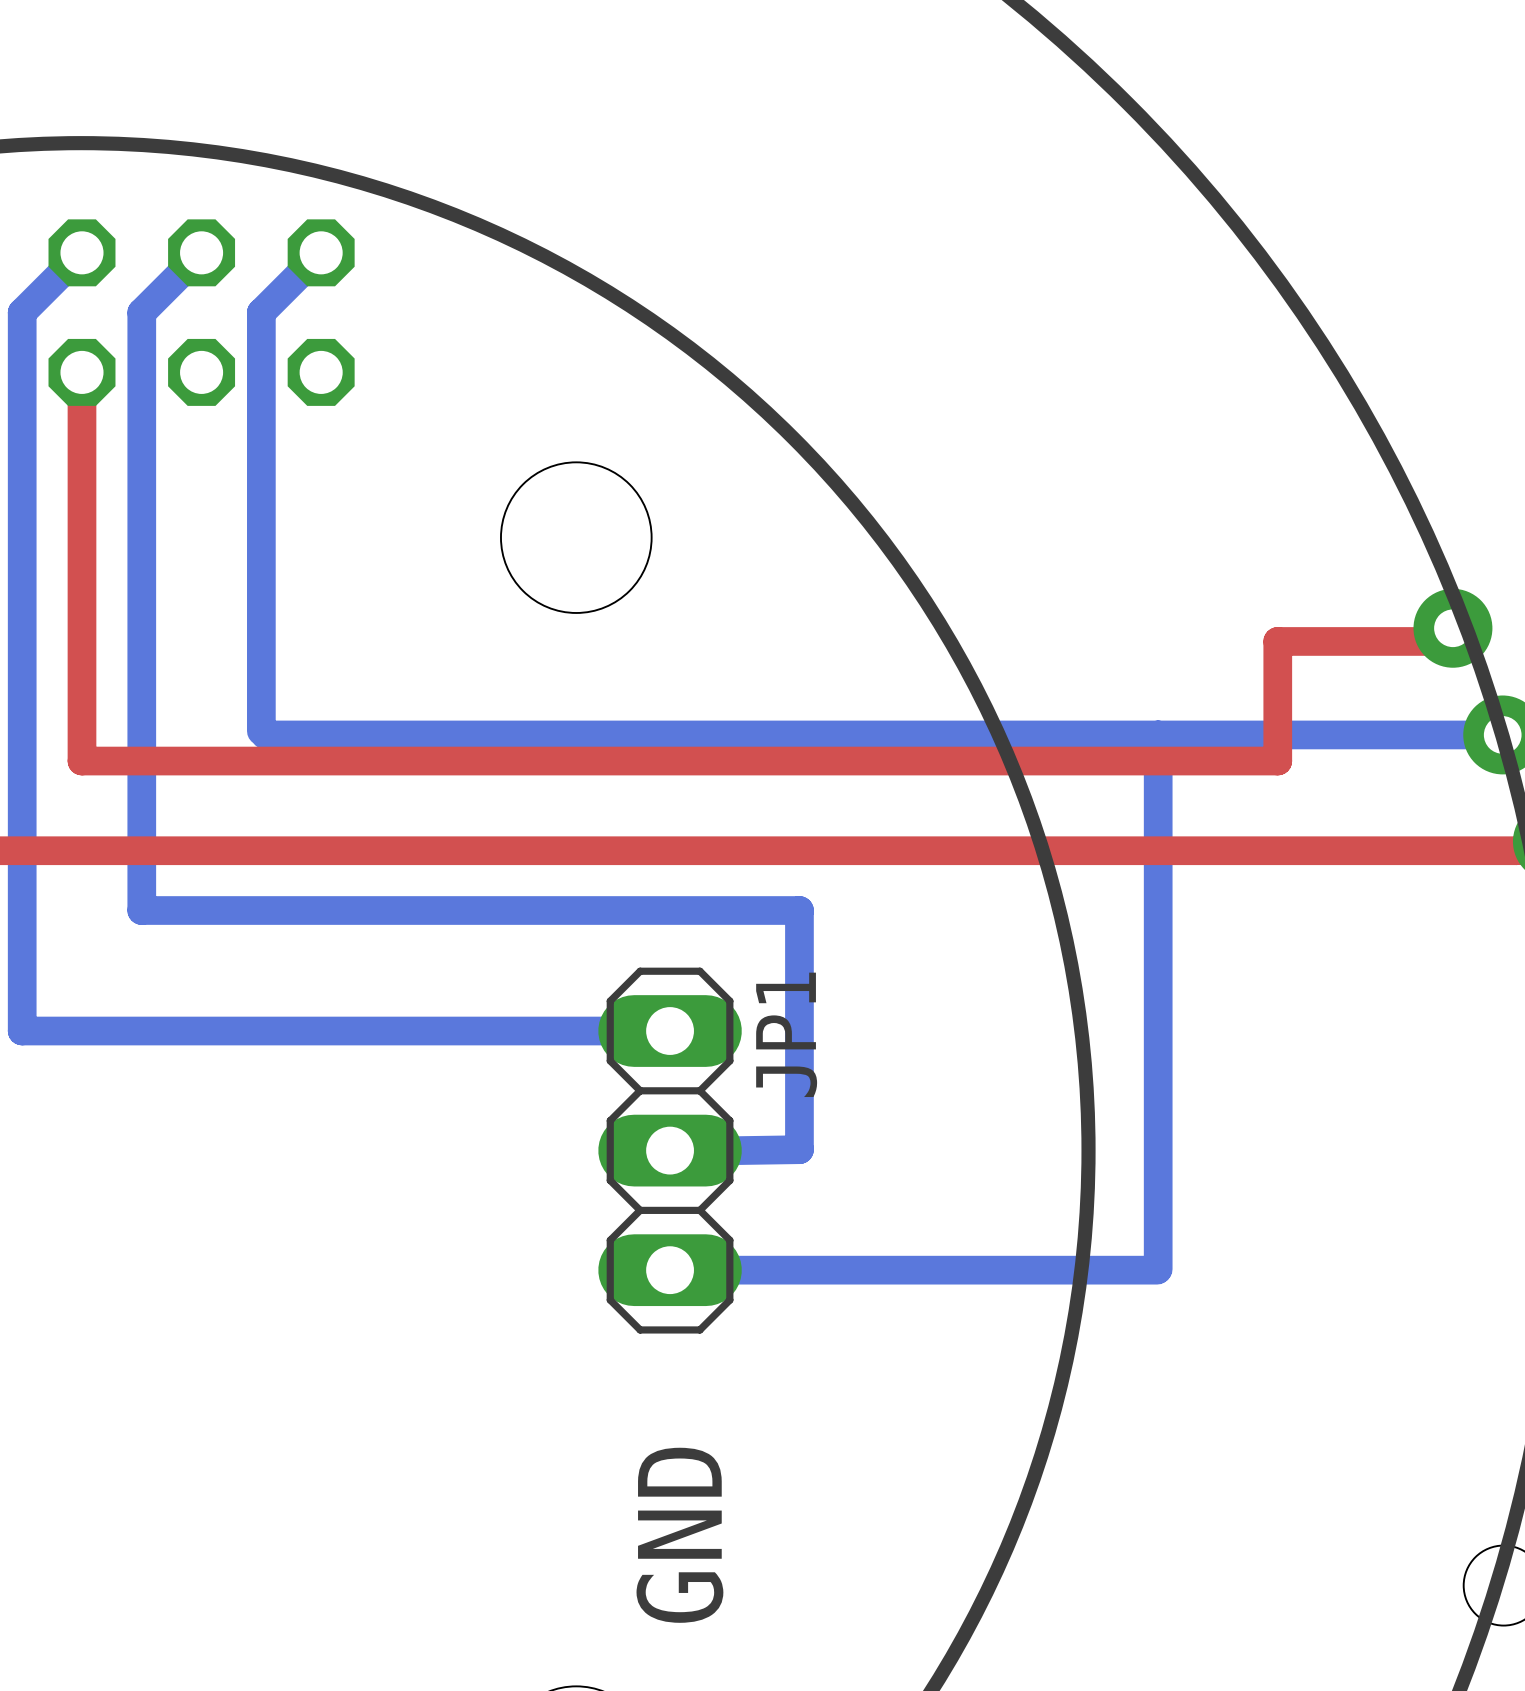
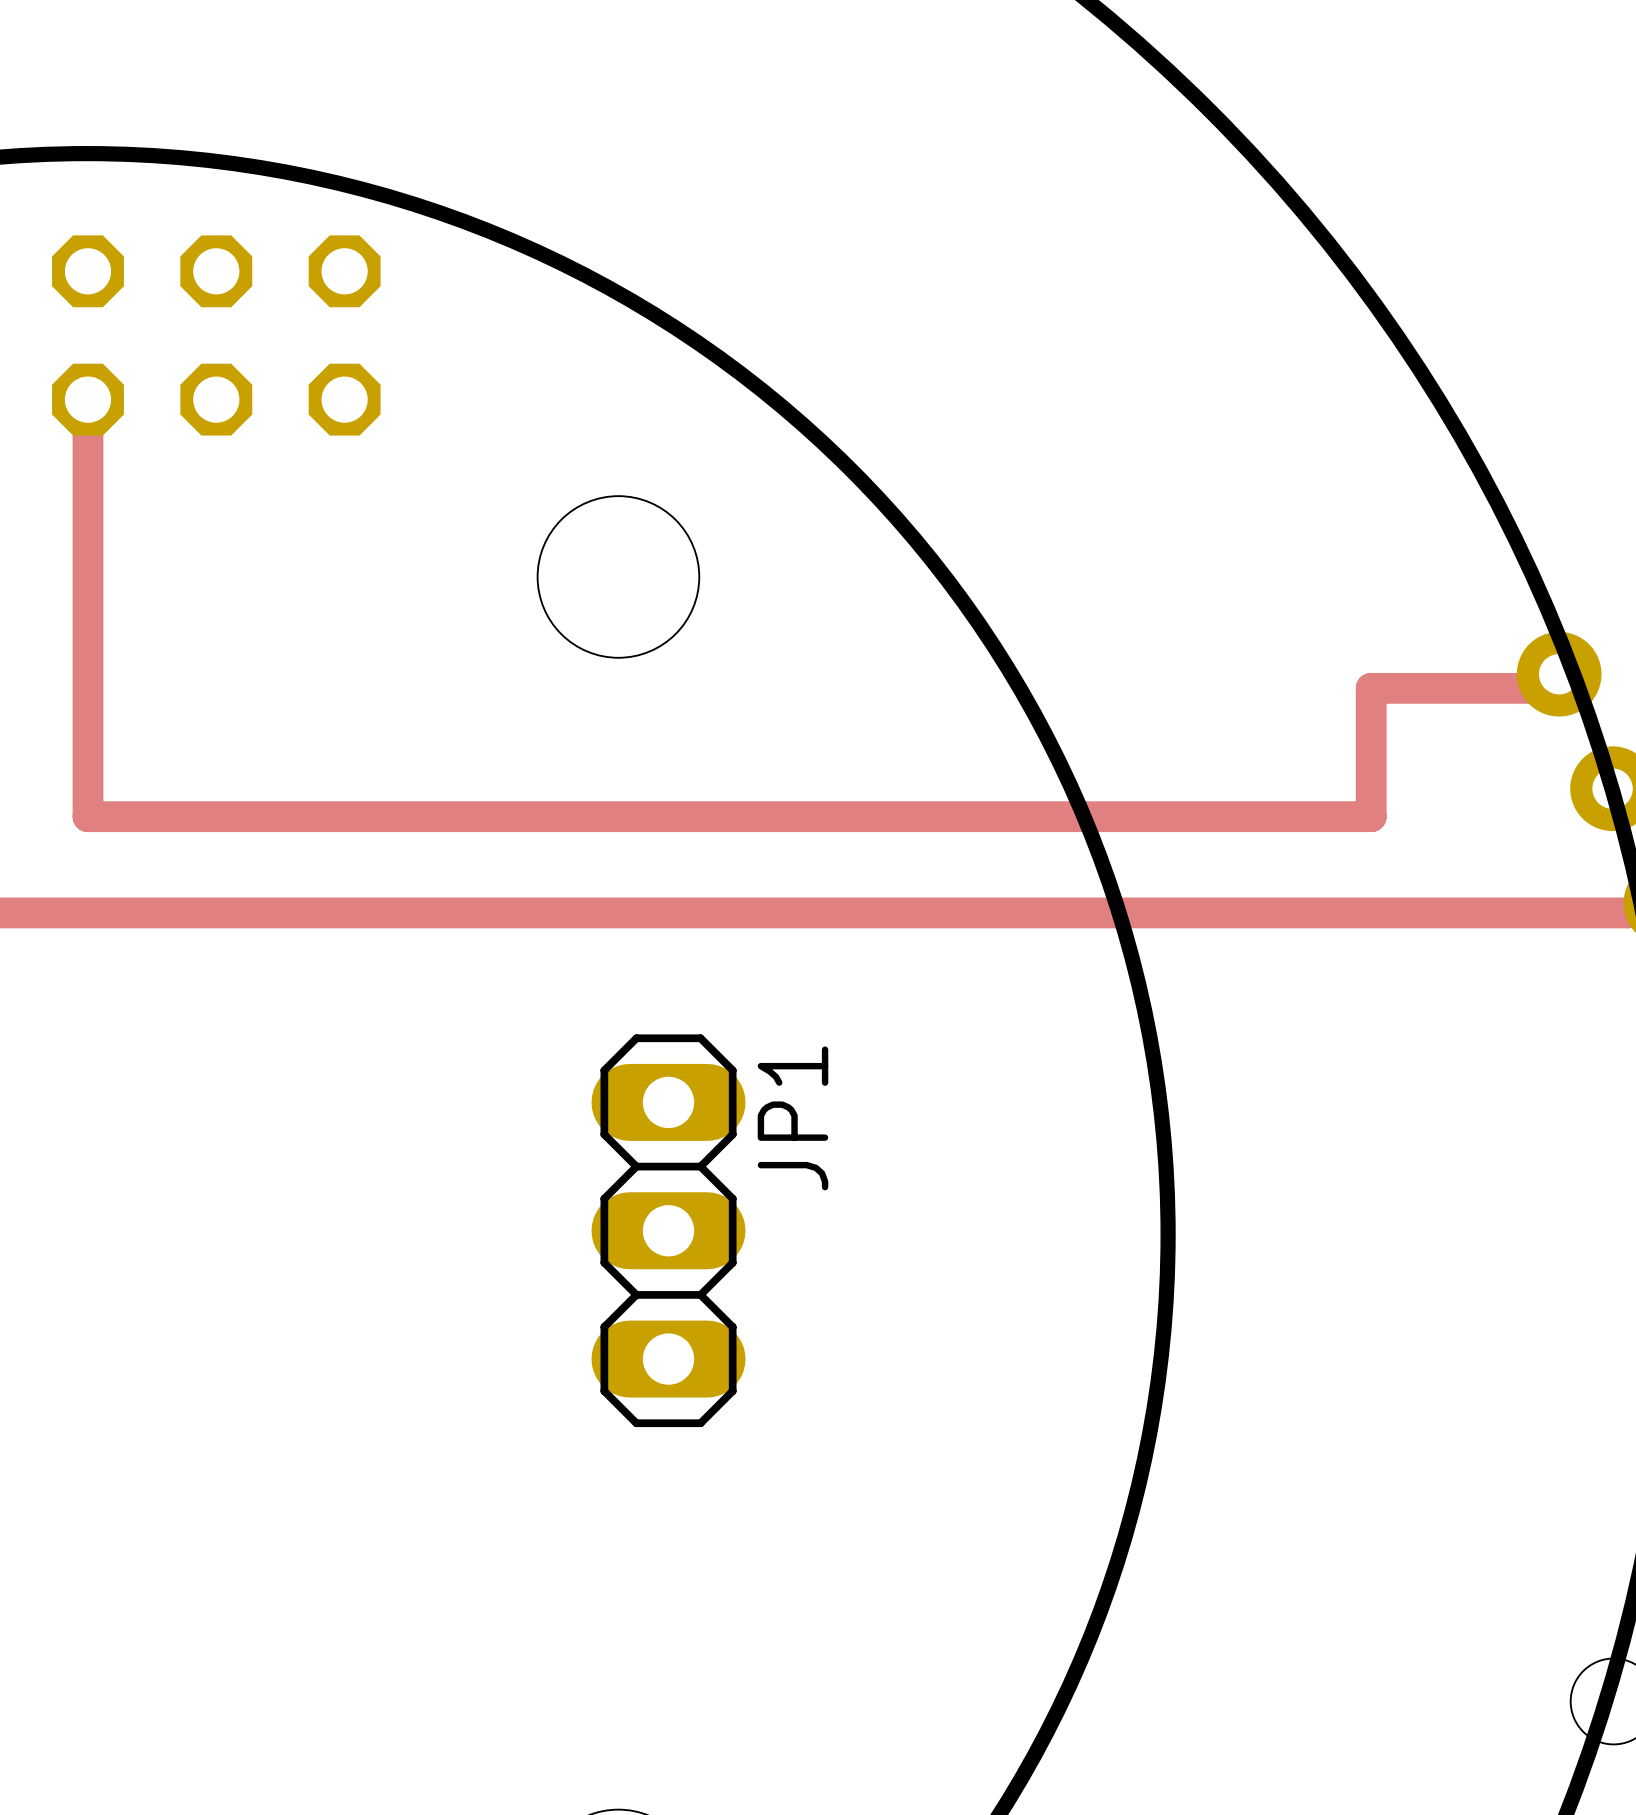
bottom track: (81, 252) (22, 312) (22, 1031) (670, 1031) -> none
bottom track: (201, 252) (141, 312) (141, 910) (799, 910) (799, 1149) (670, 1150) -> none
bottom track: (321, 252) (261, 312) (261, 731) (265, 734) (1502, 734) -> none
bottom track: (1158, 734) (1158, 1269) (670, 1270) -> none
JP1 position: (670, 1150) -> (668, 1230)
text: GND (679, 1535) -> none

